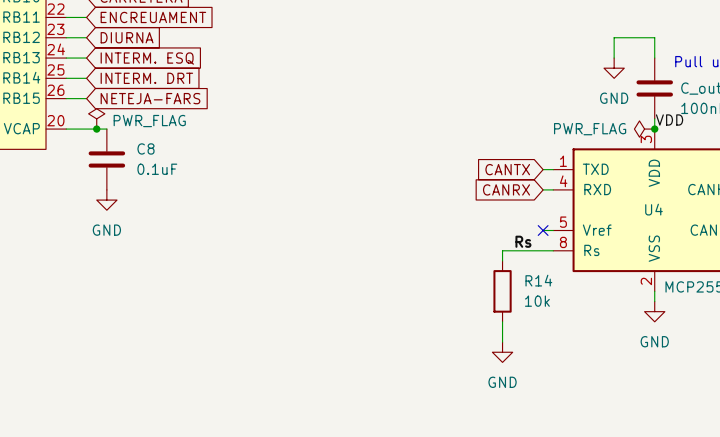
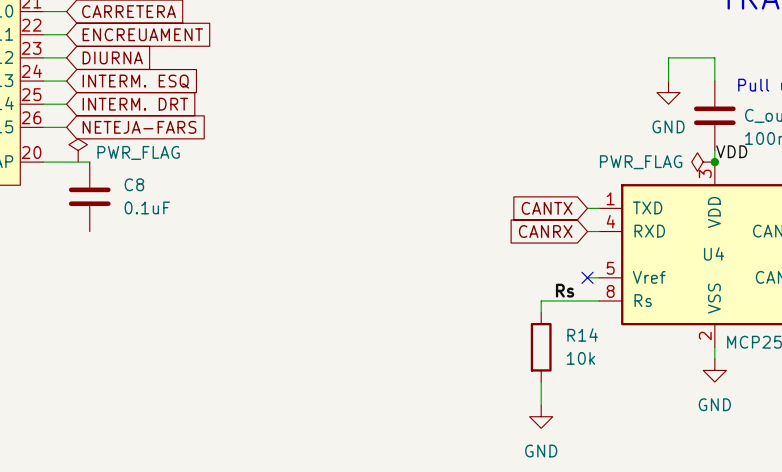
junction: (96, 129) -> none
power symbol: GND (106, 200) -> none

